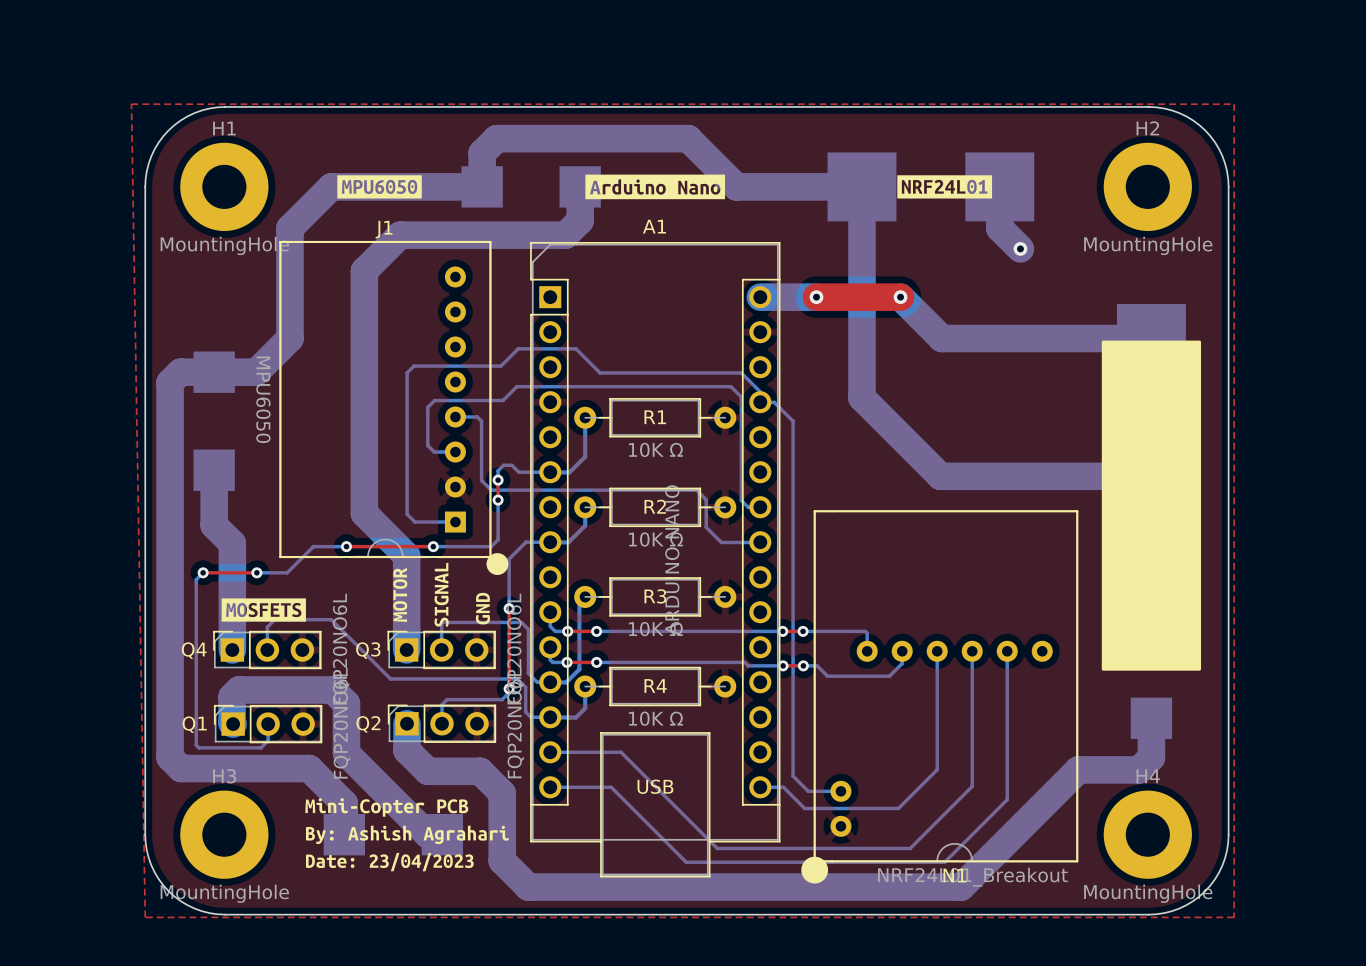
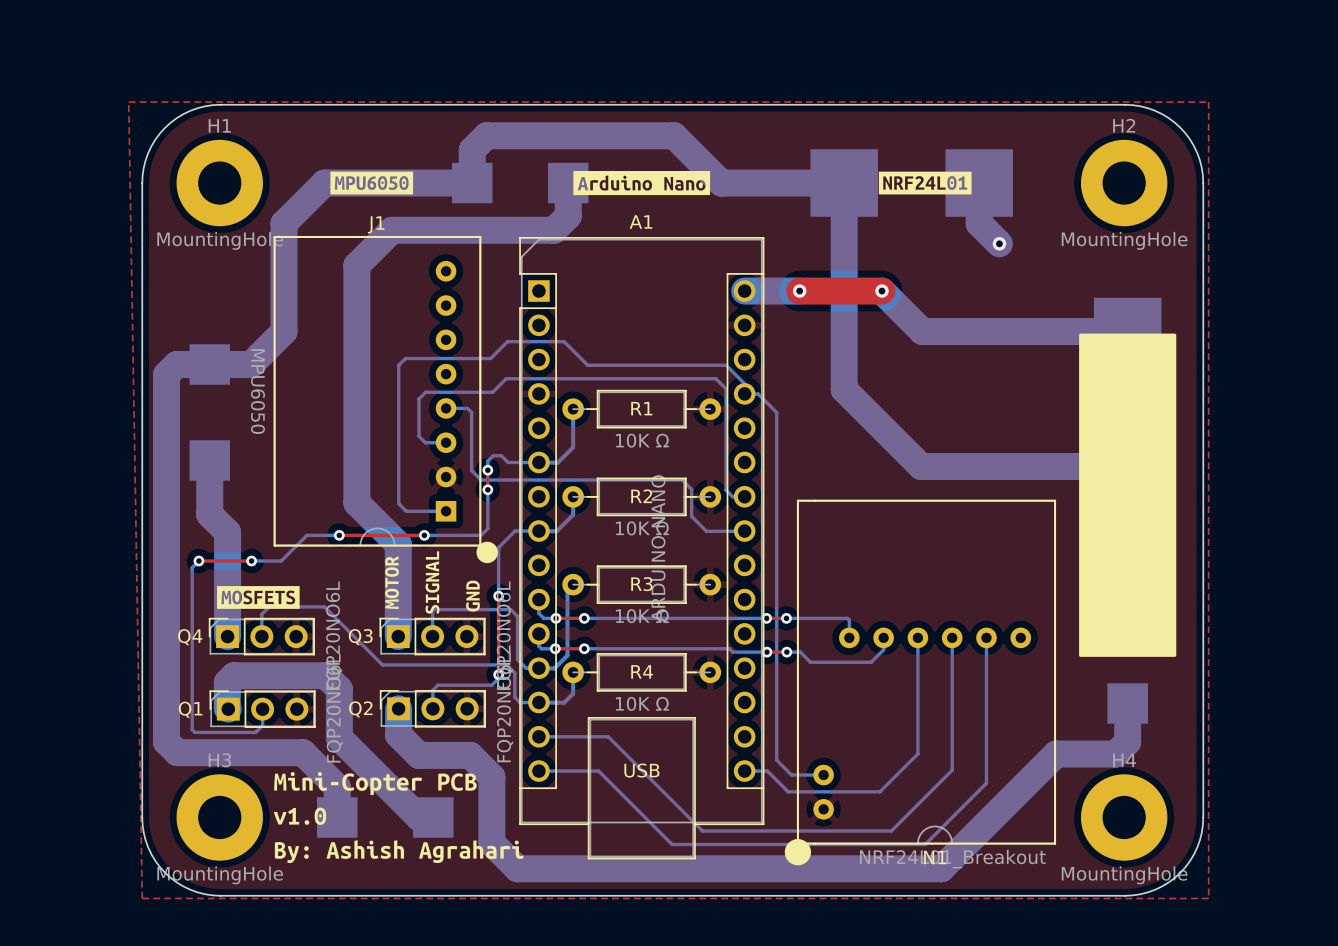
drawing shape: [305, 798, 509, 872] -> [273, 771, 524, 864]

